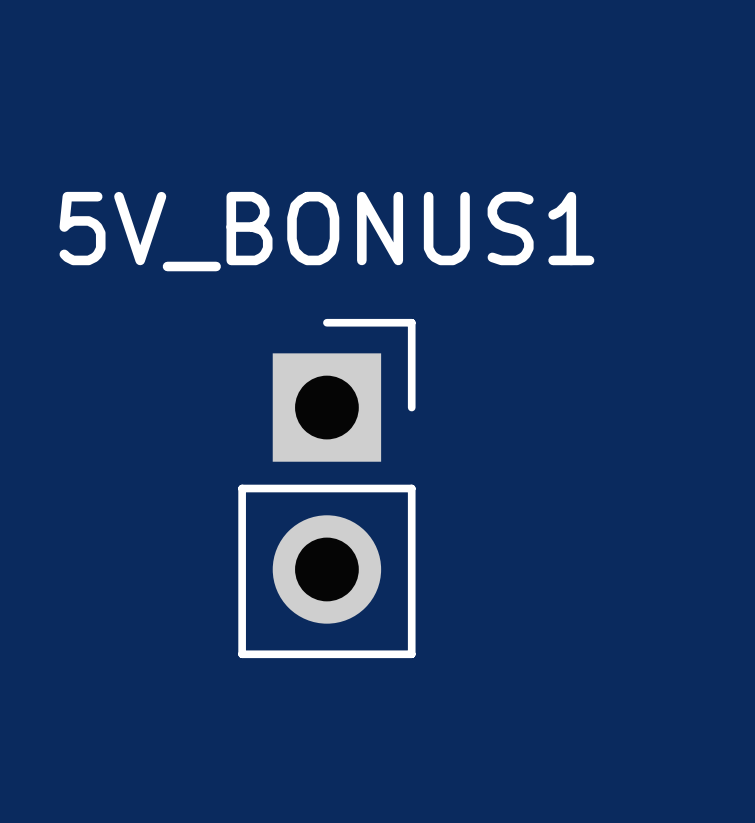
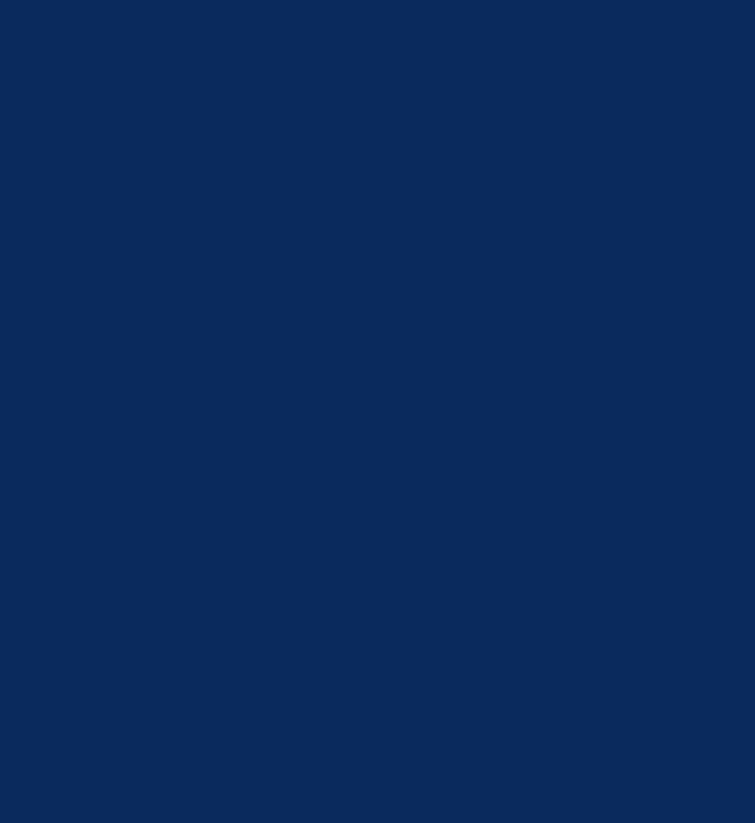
5V_BONUS1: (326, 488) -> none

